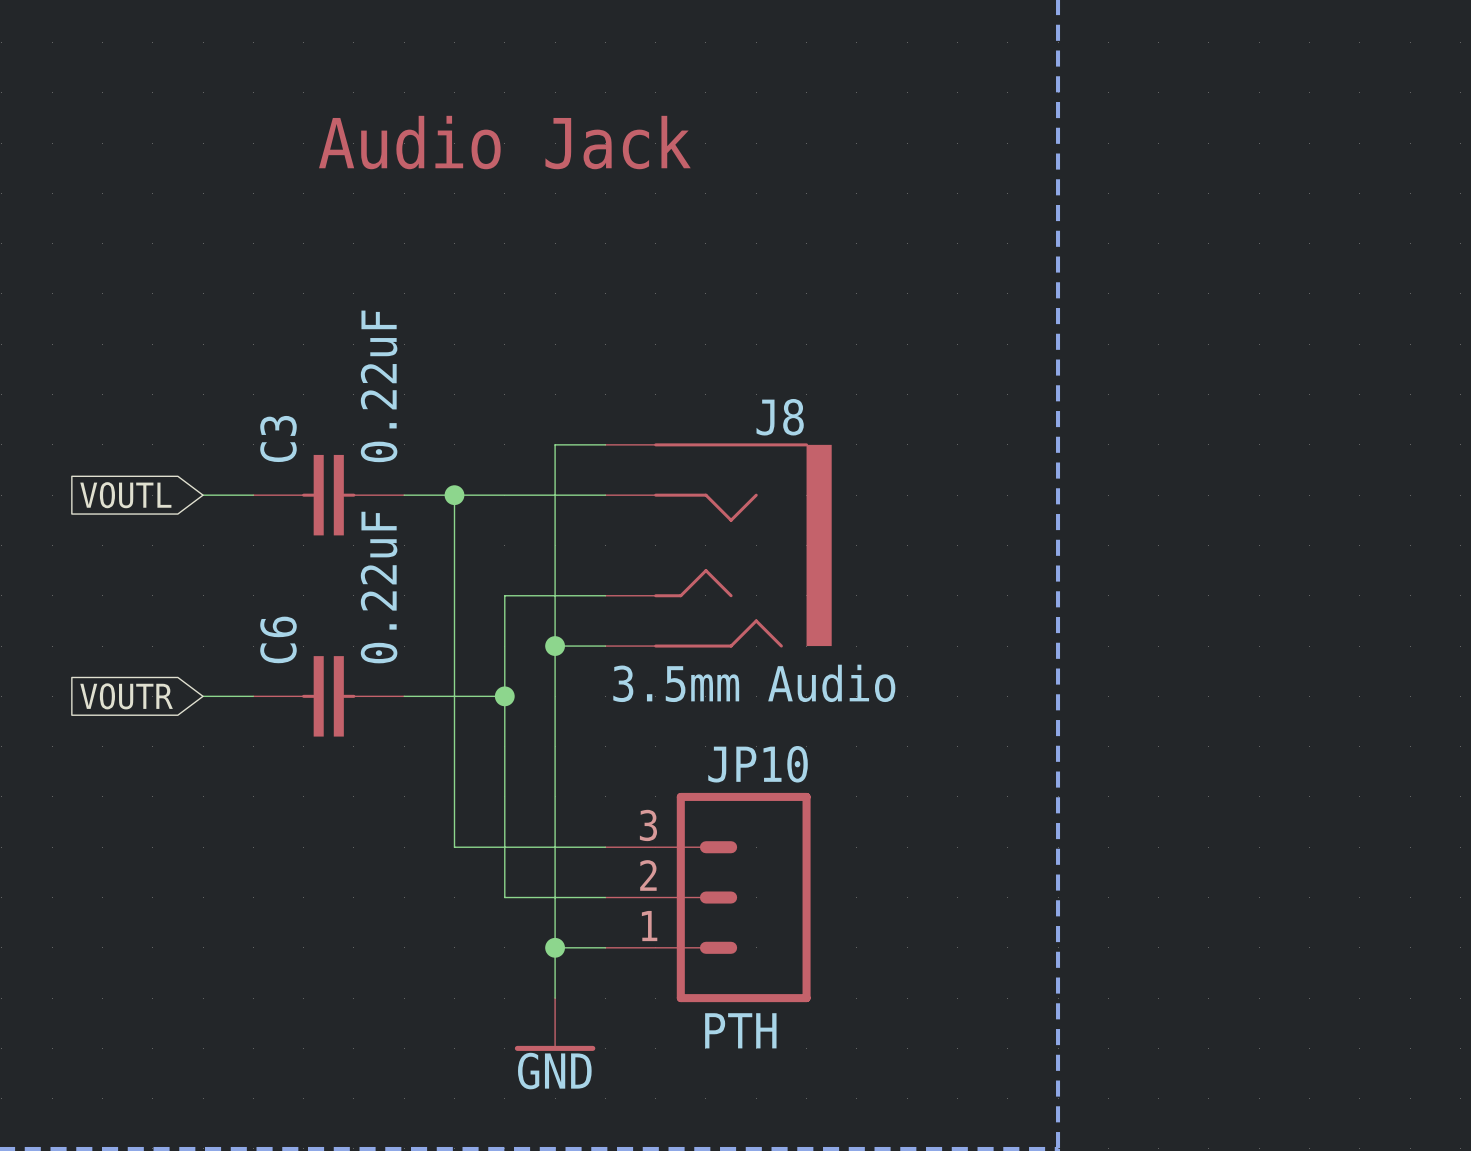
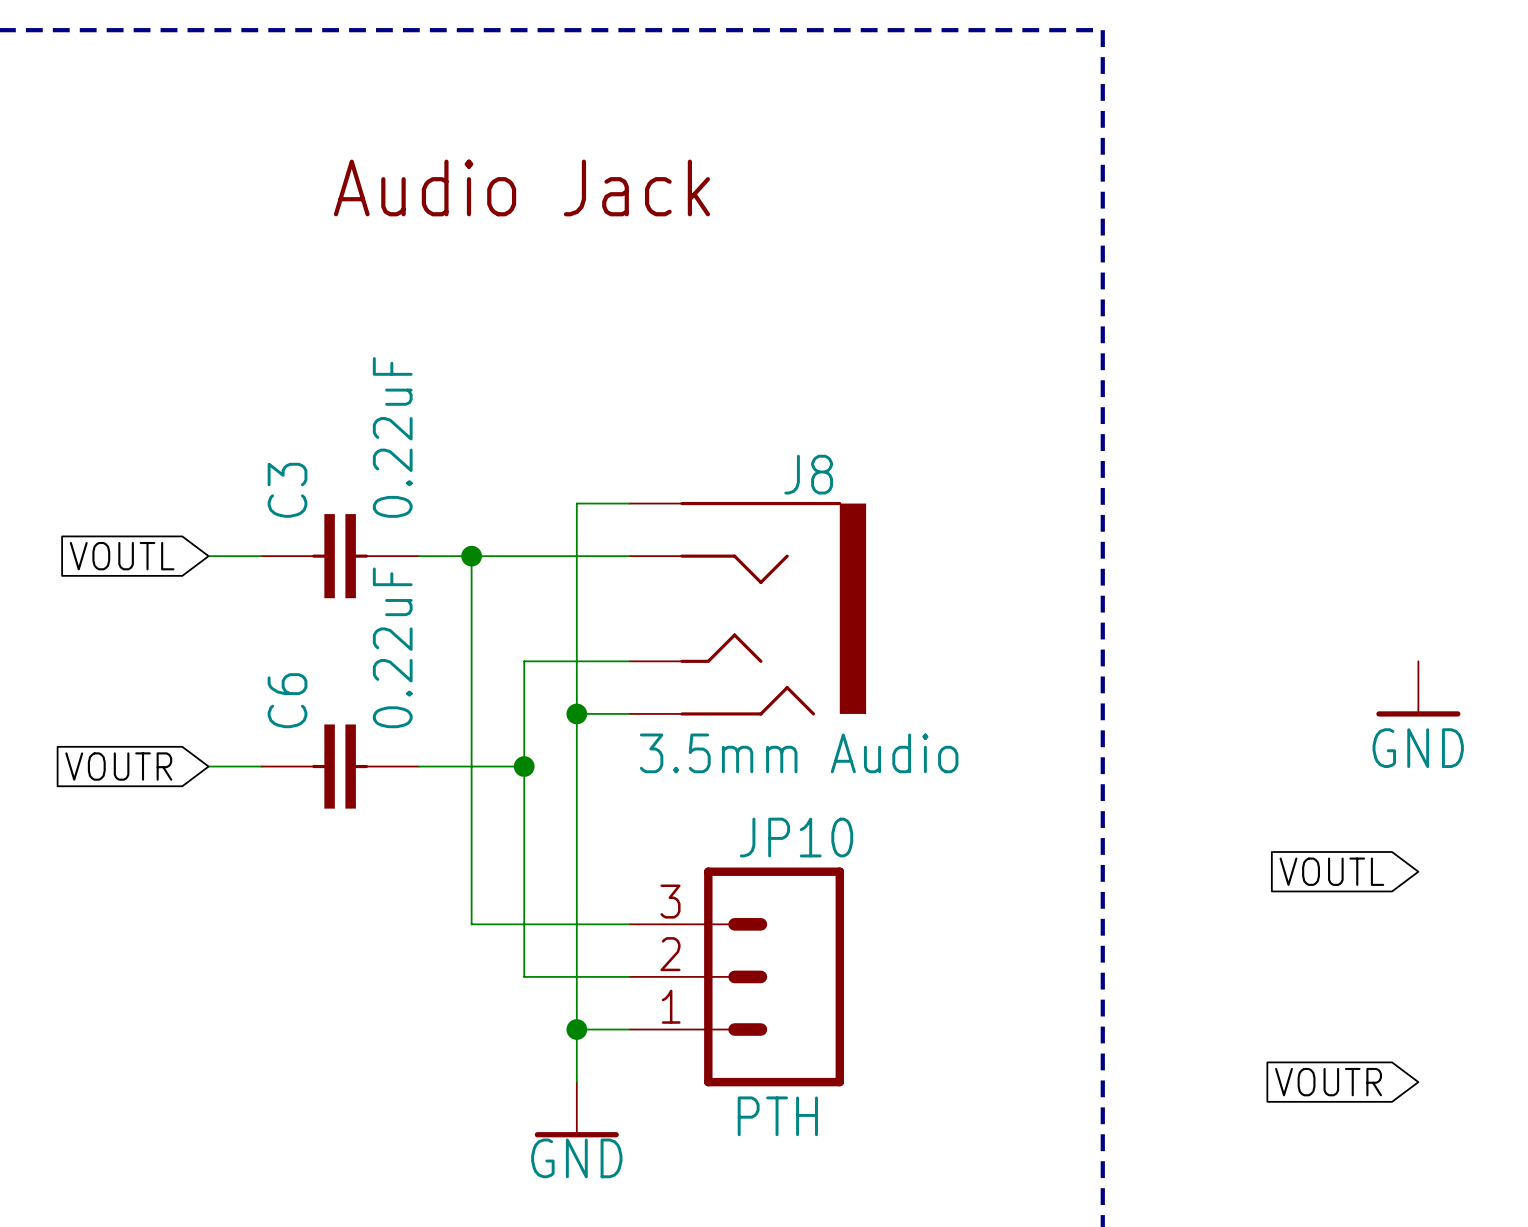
power symbol: none -> GND (1418, 688)
global label: none -> VOUTL (1331, 871)
global label: none -> VOUTR (1328, 1082)

